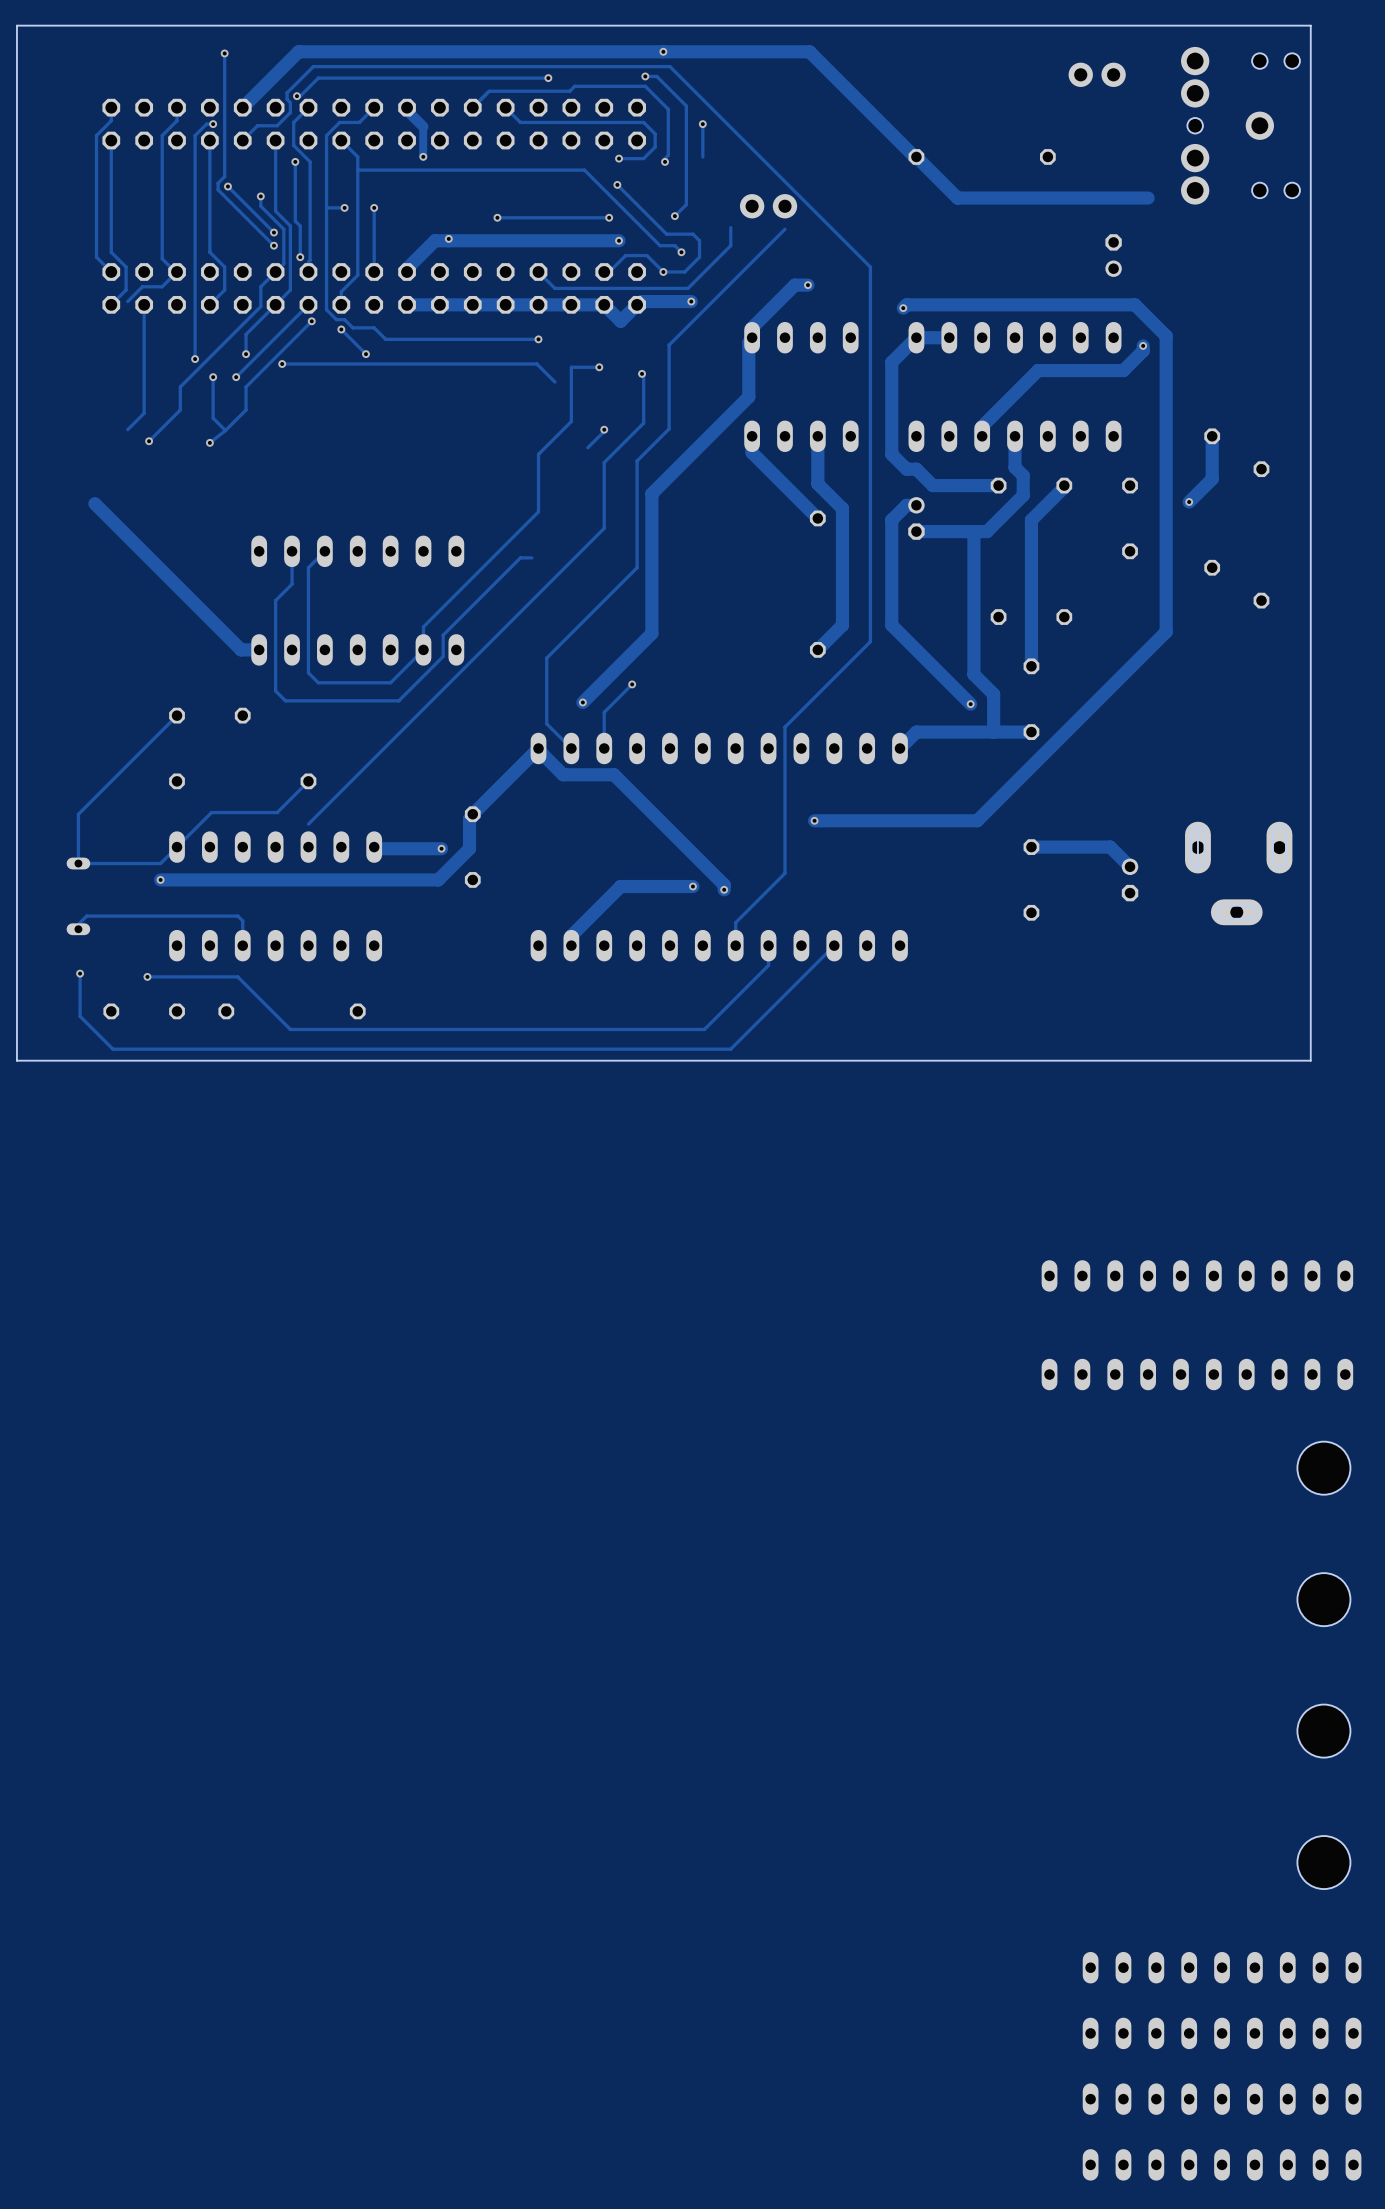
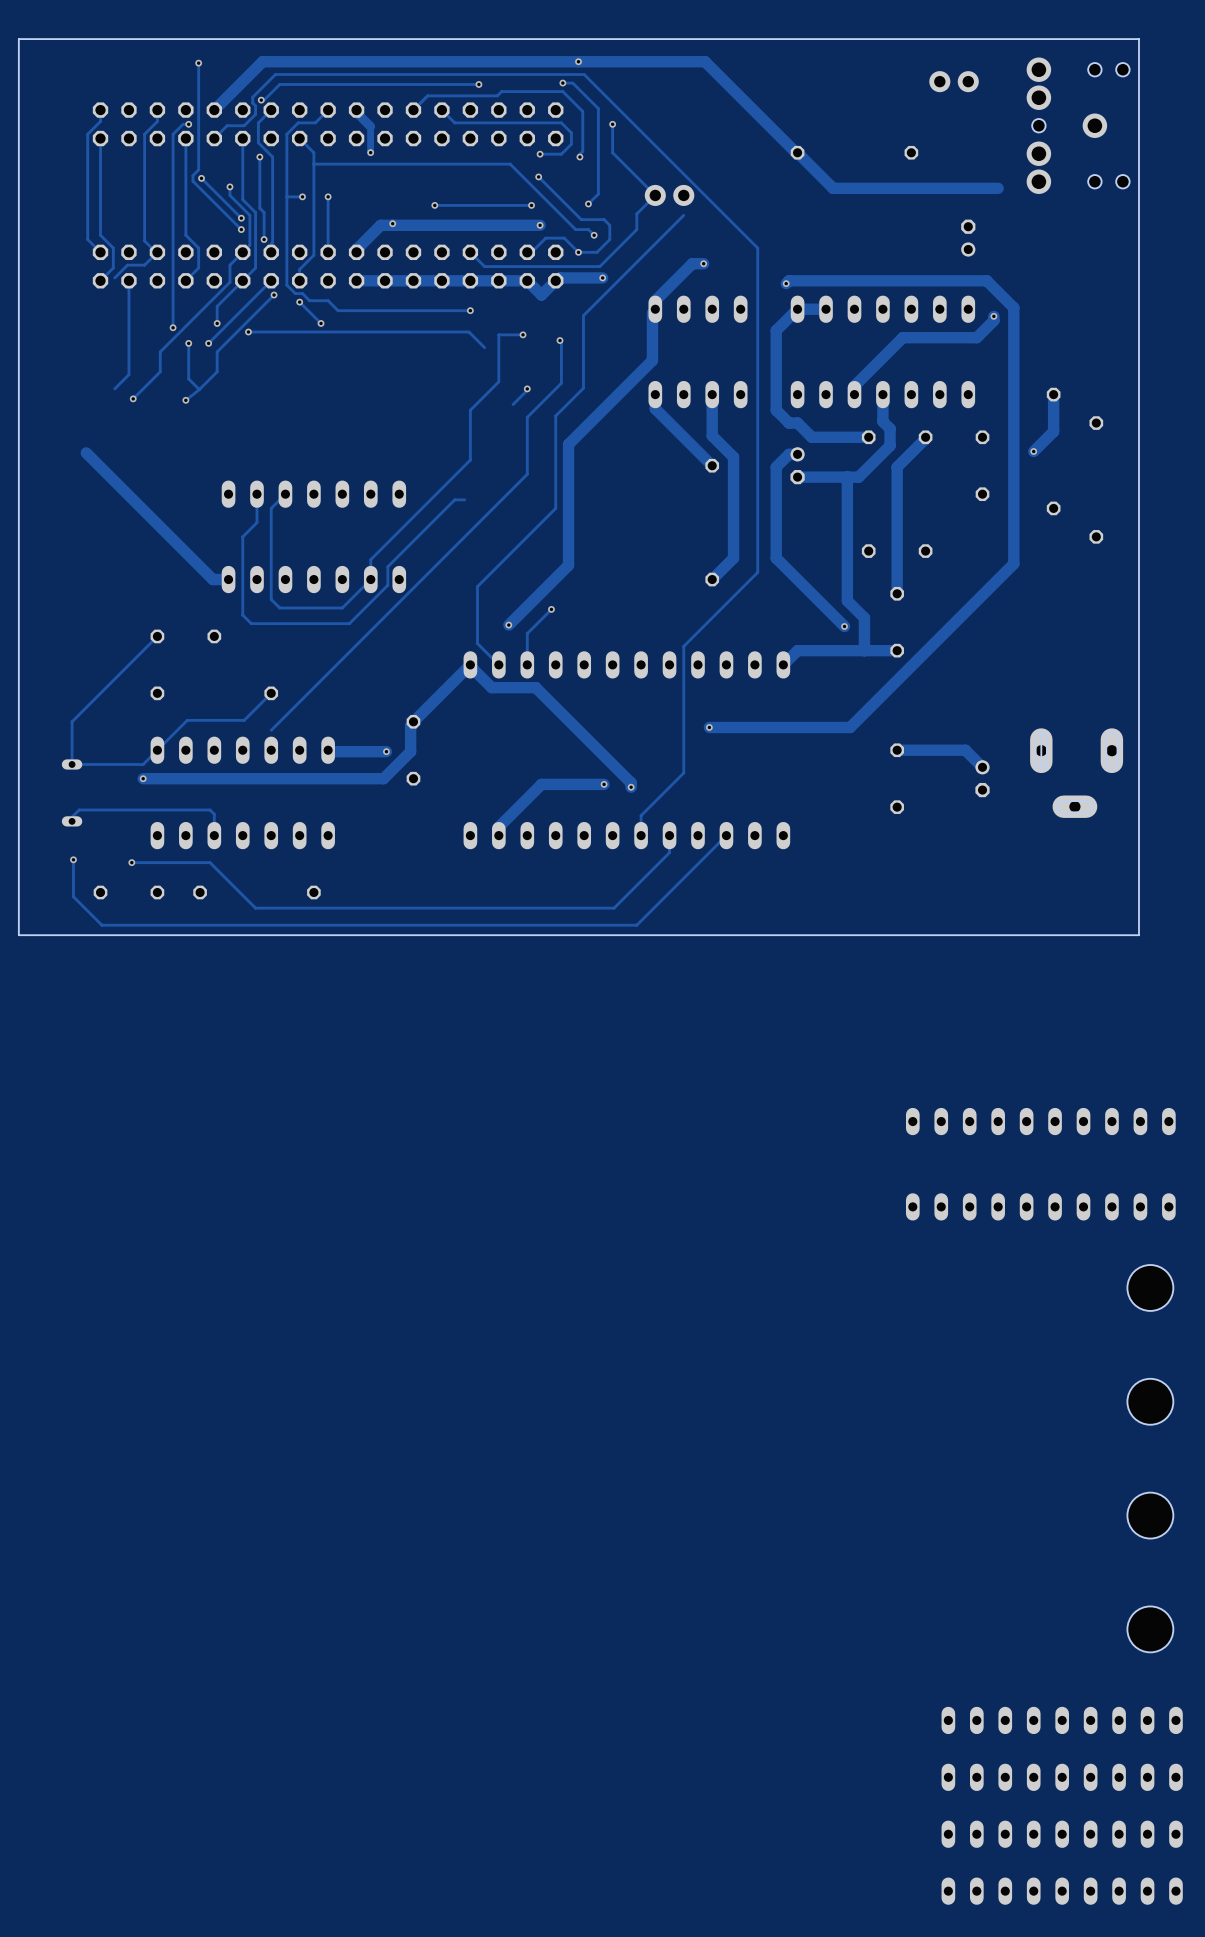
track: none -> (612, 152) (655, 195) (636, 213)

